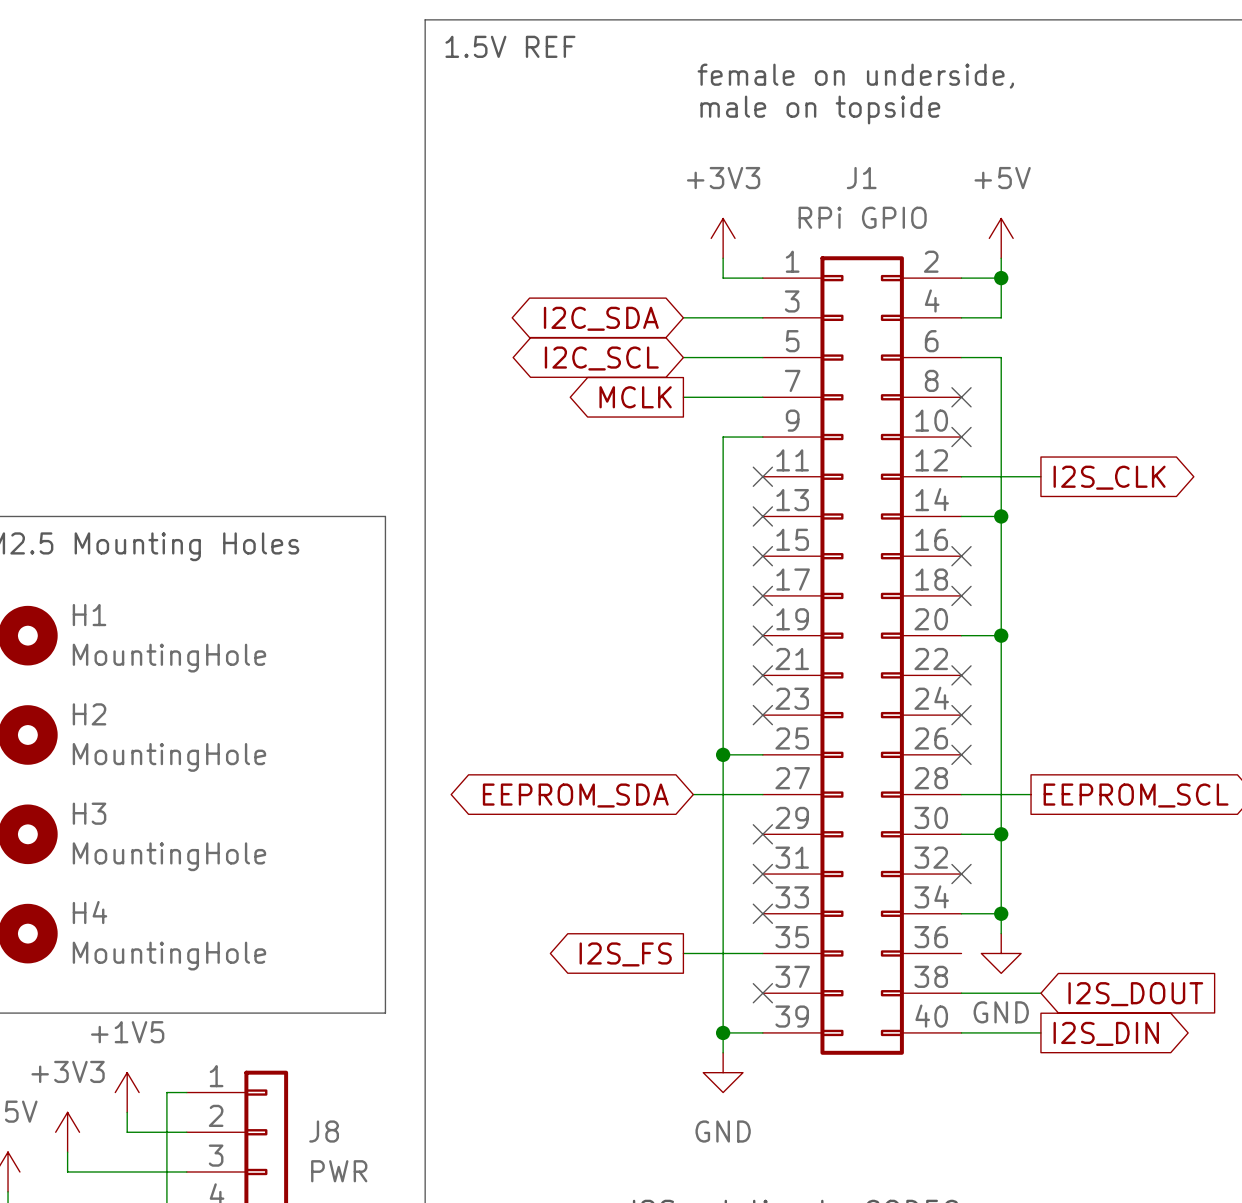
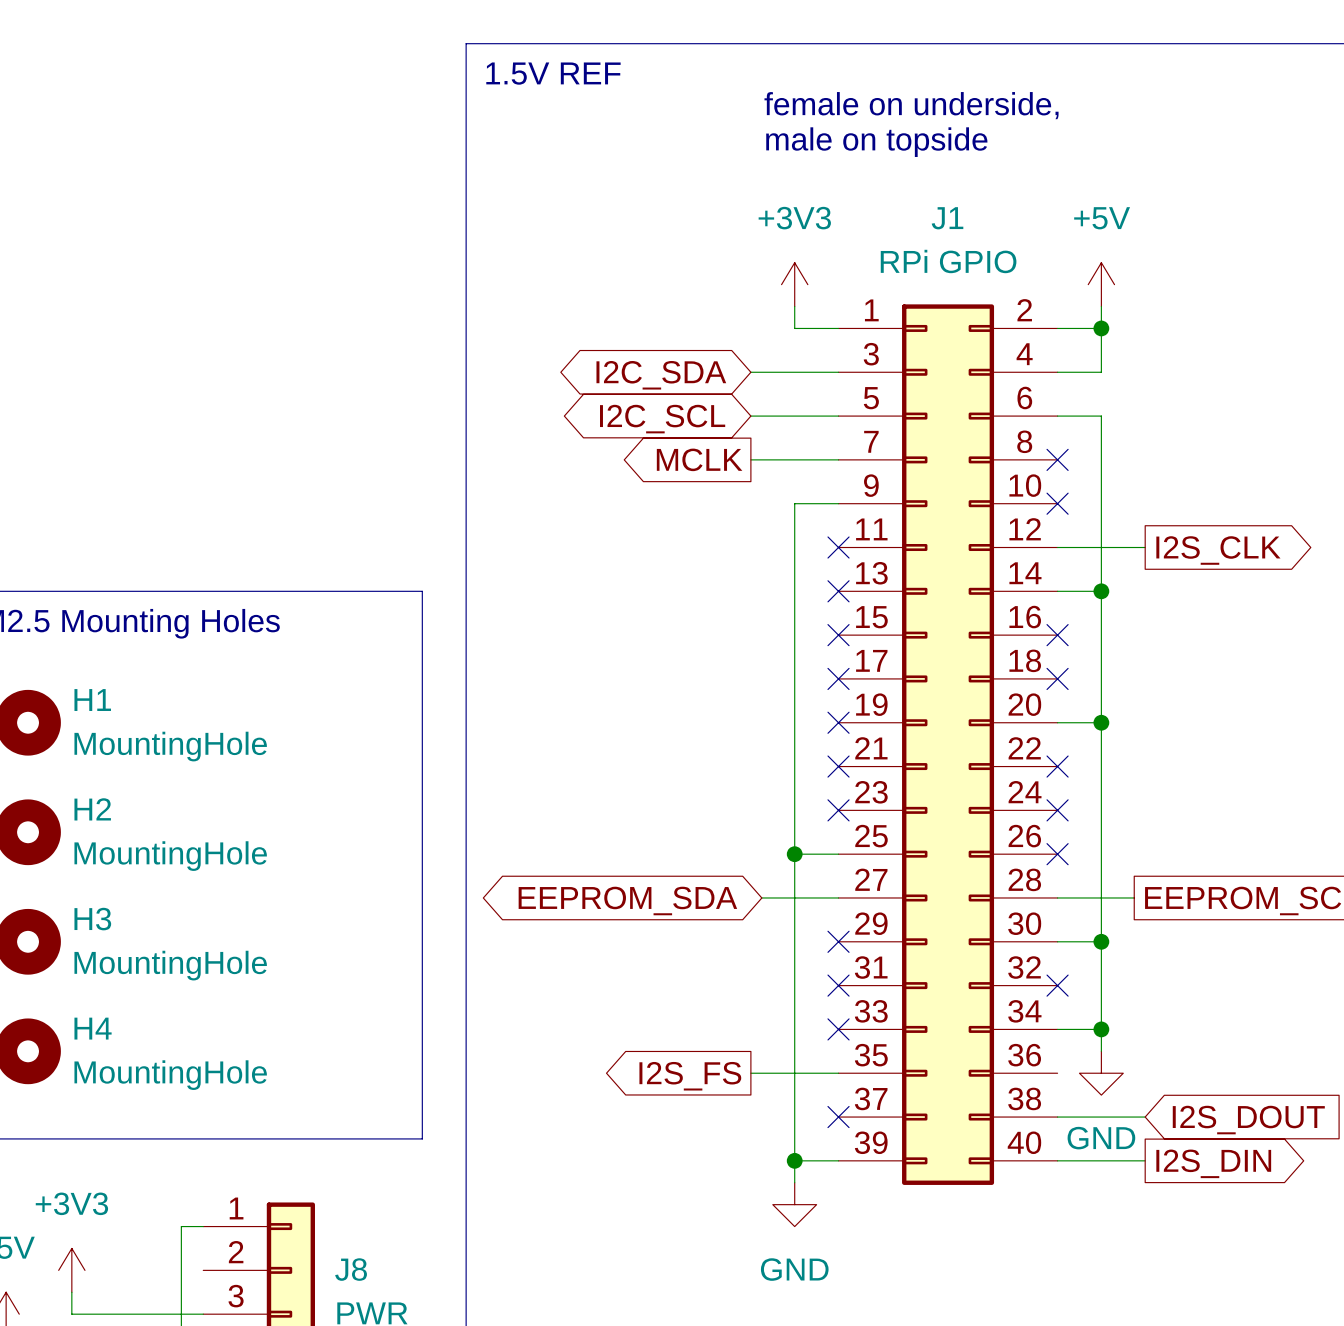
power symbol: +1V5 (127, 1092) -> none
wire: (127, 1112) (127, 1132) (186, 1132) -> none

